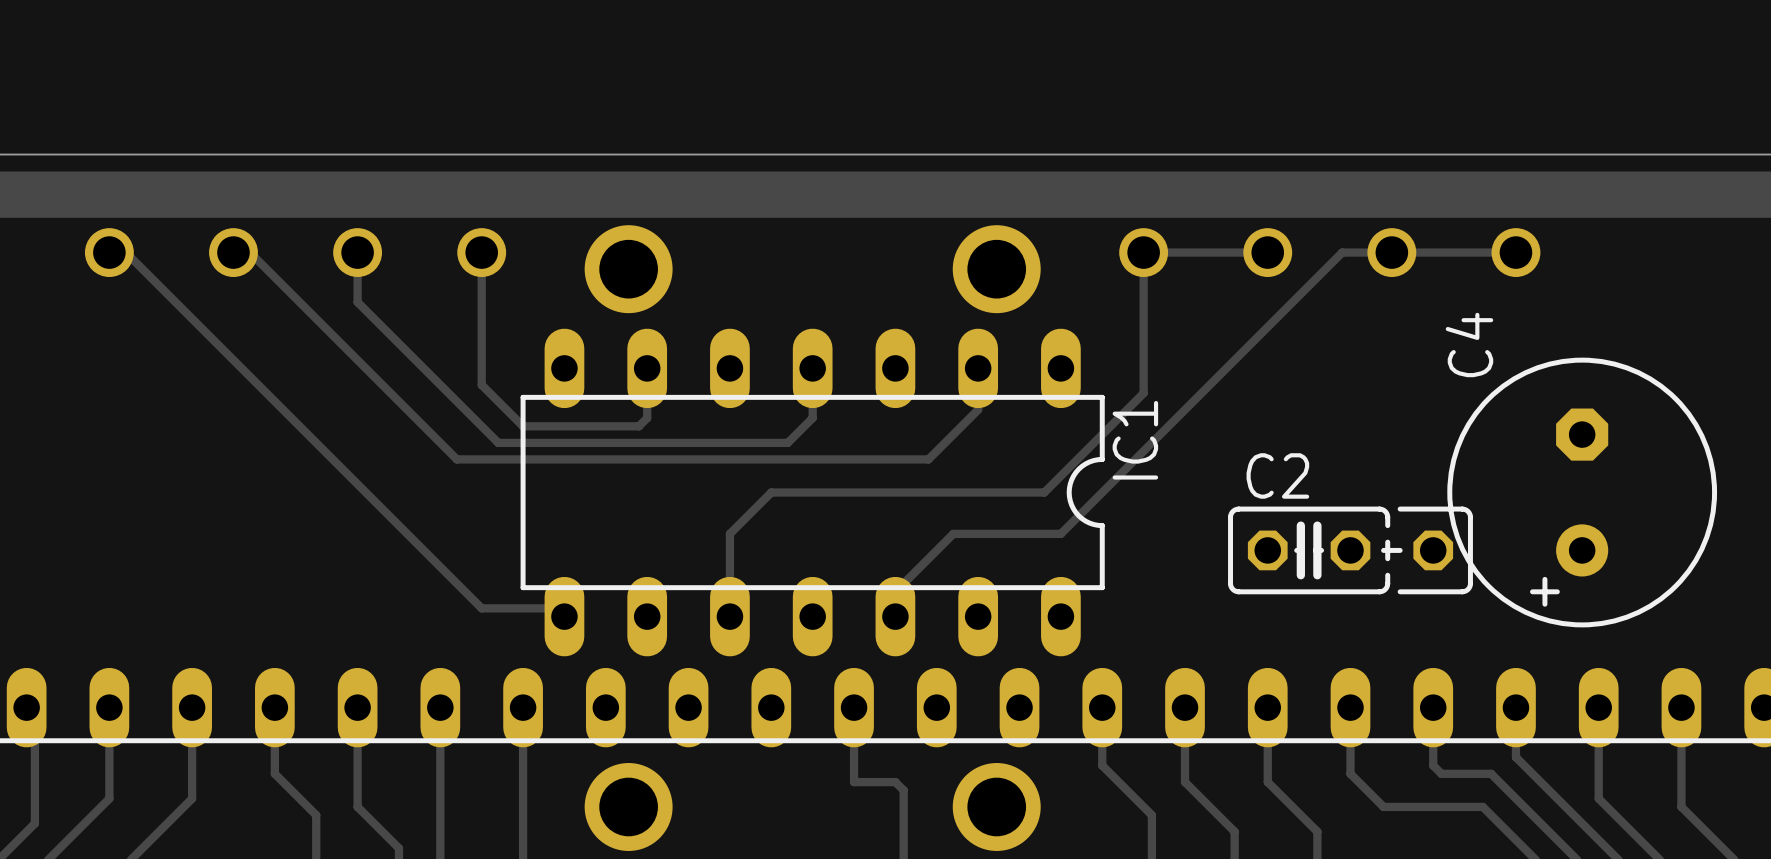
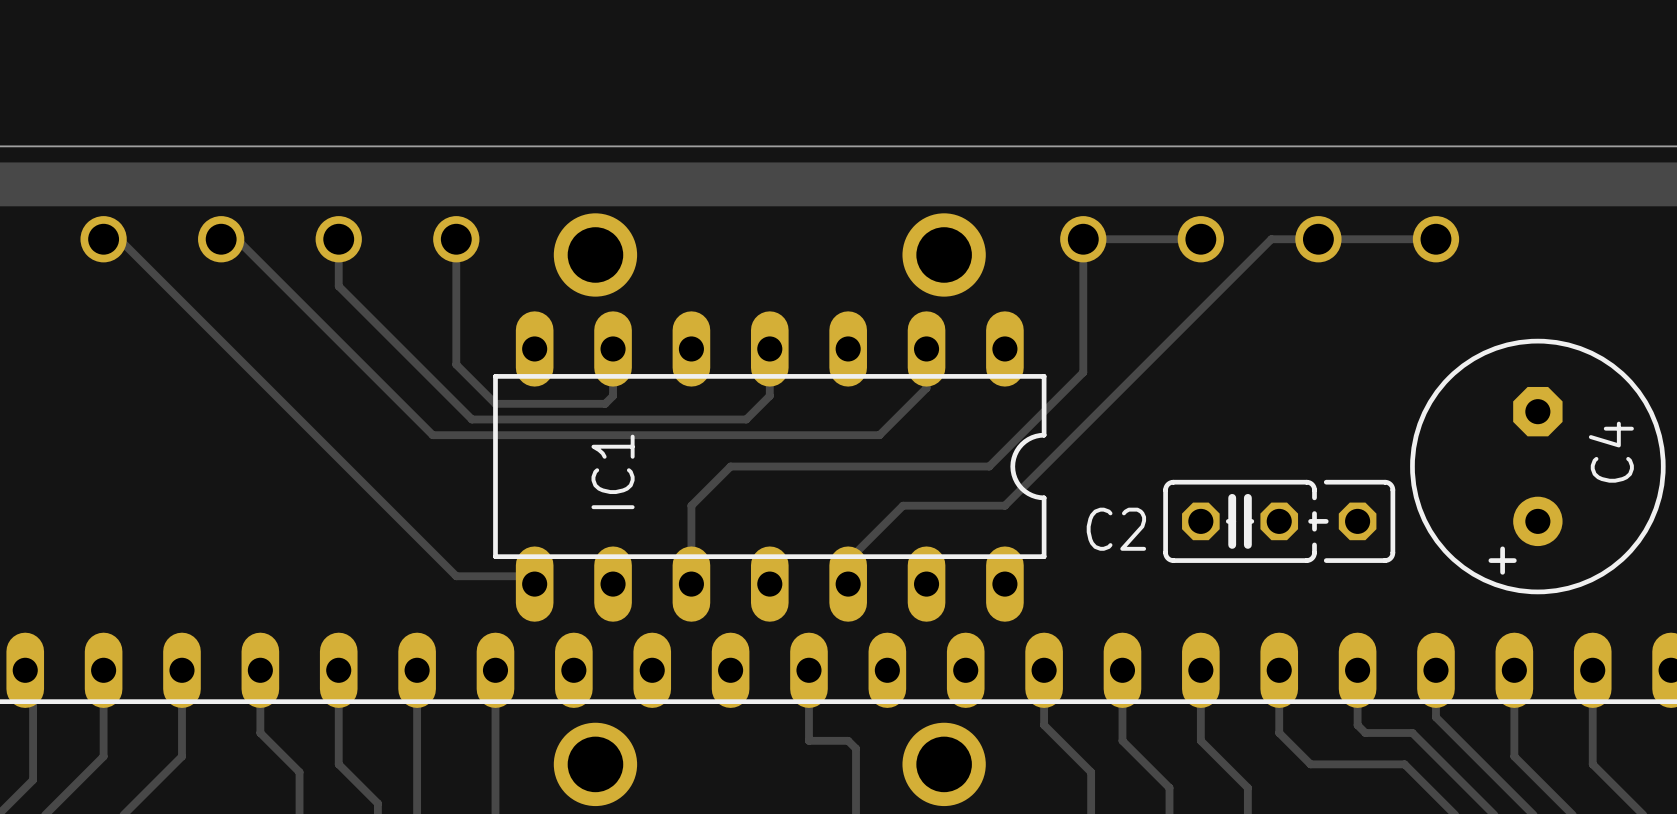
C4 name position: C4 (1469, 344) -> C4 (1611, 452)
IC1 name position: IC1 (1135, 440) -> IC1 (613, 471)
C2 name position: C2 (1277, 475) -> C2 (1116, 529)
C4 position: (1582, 492) -> (1537, 466)

